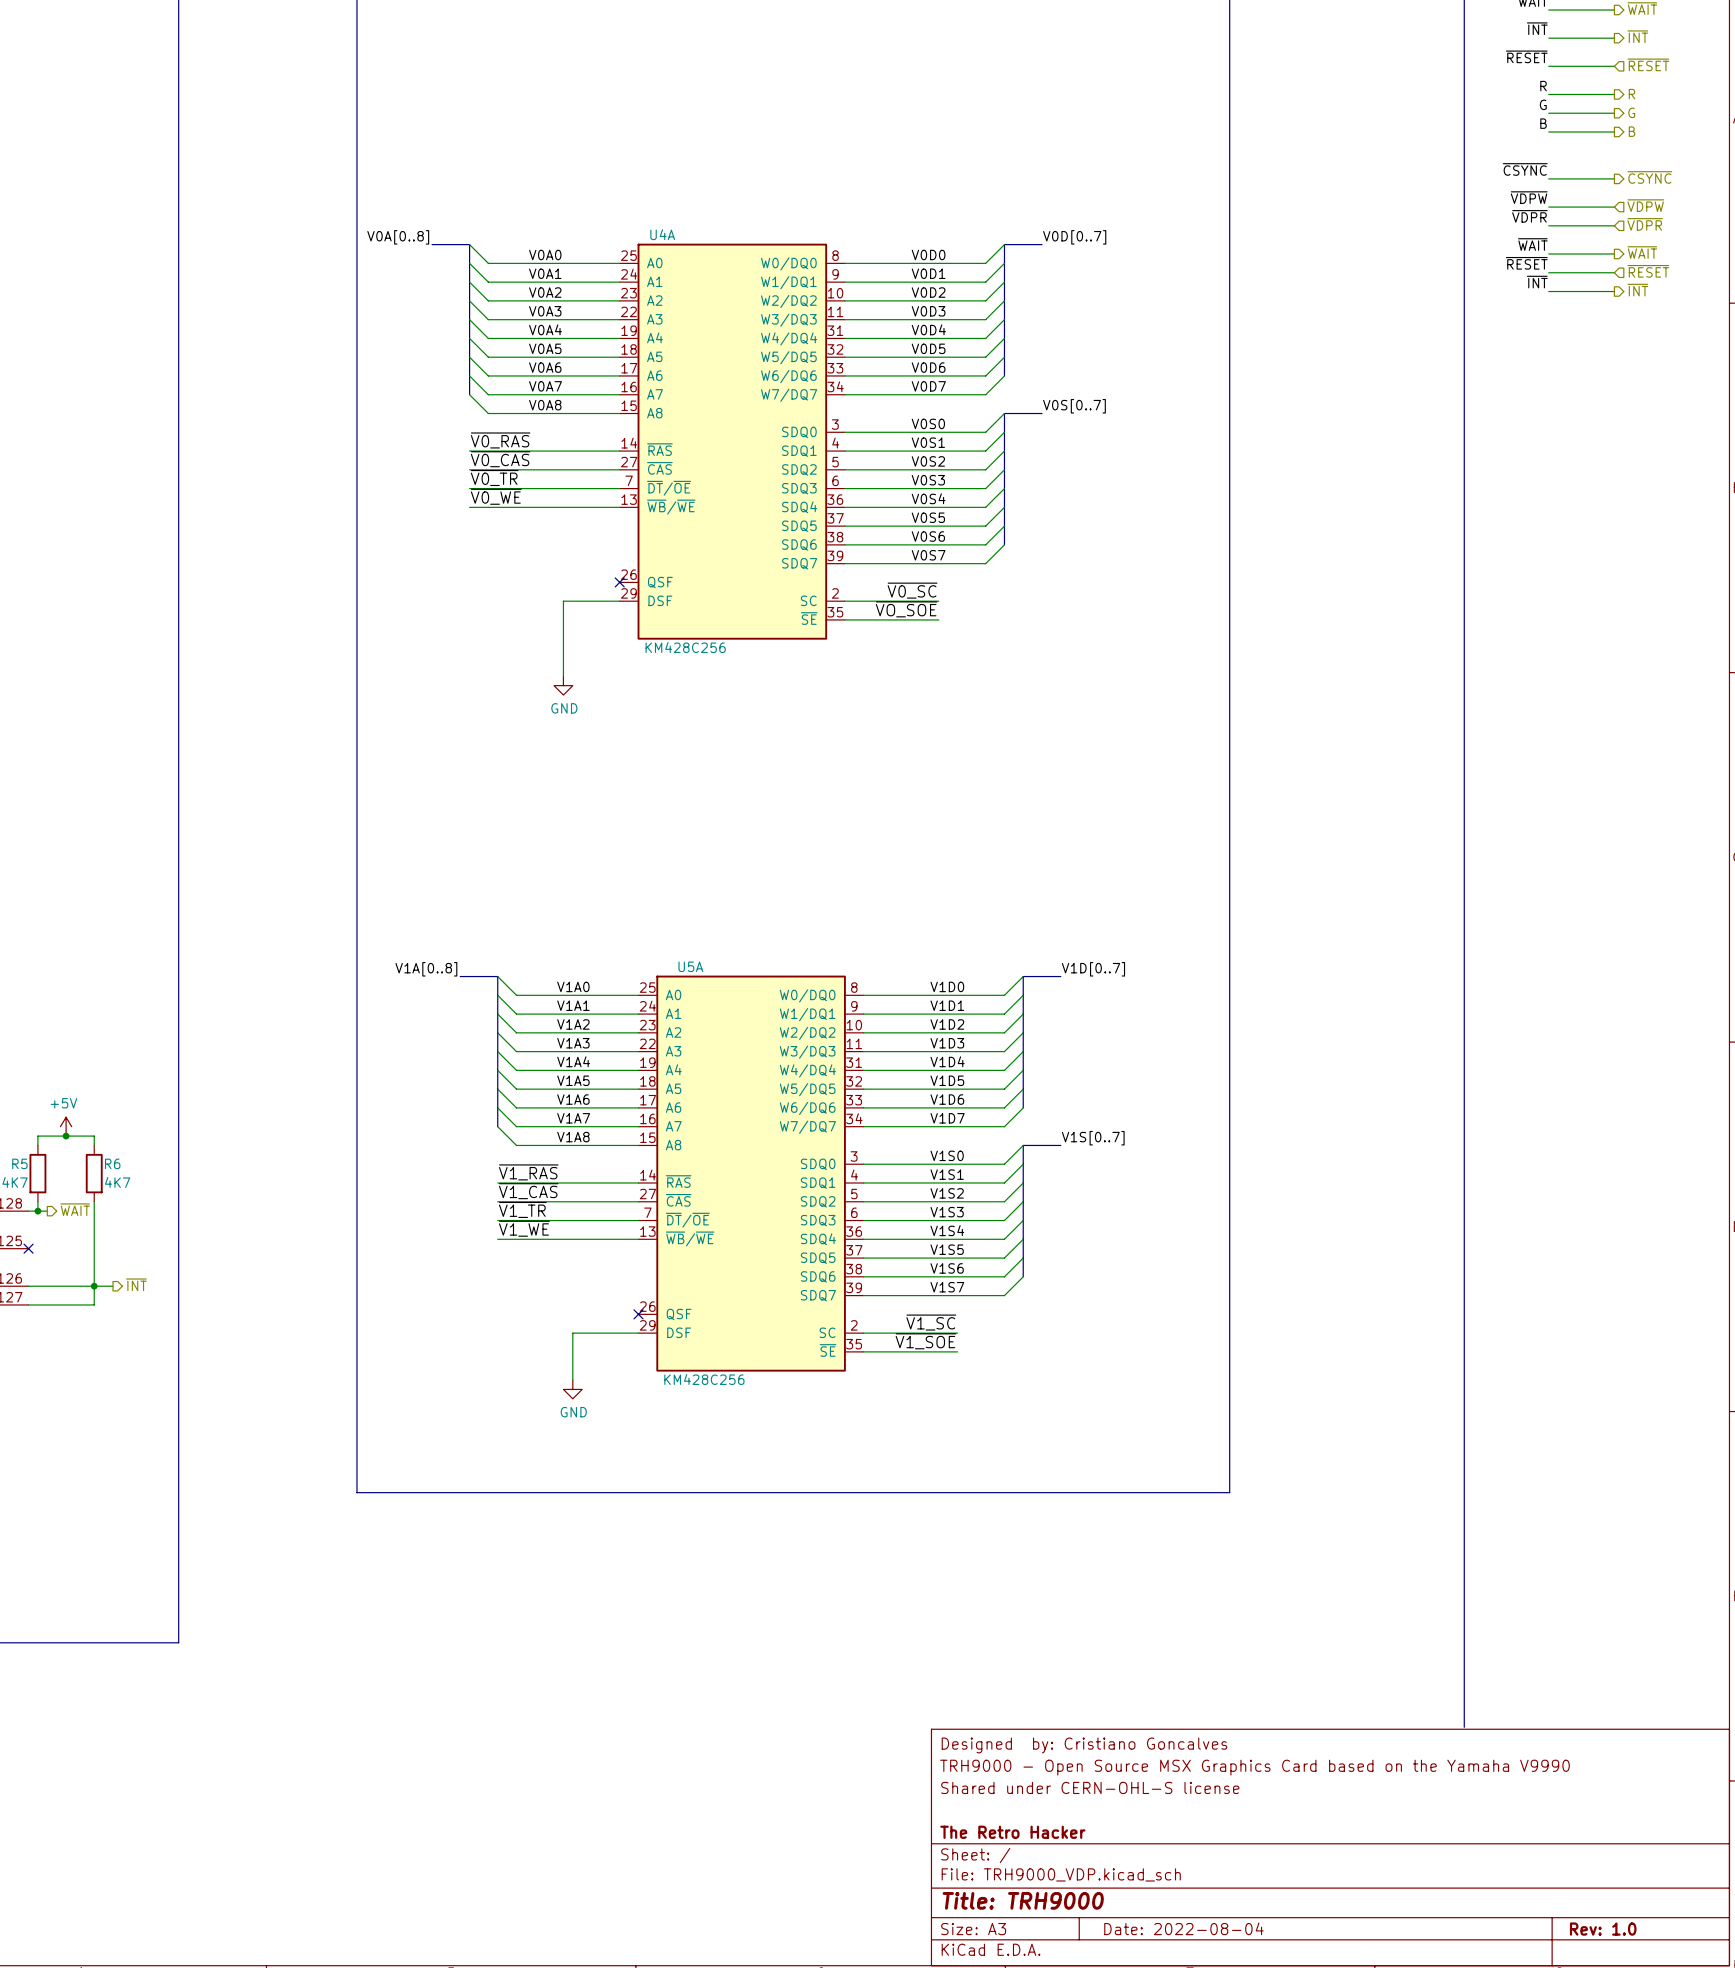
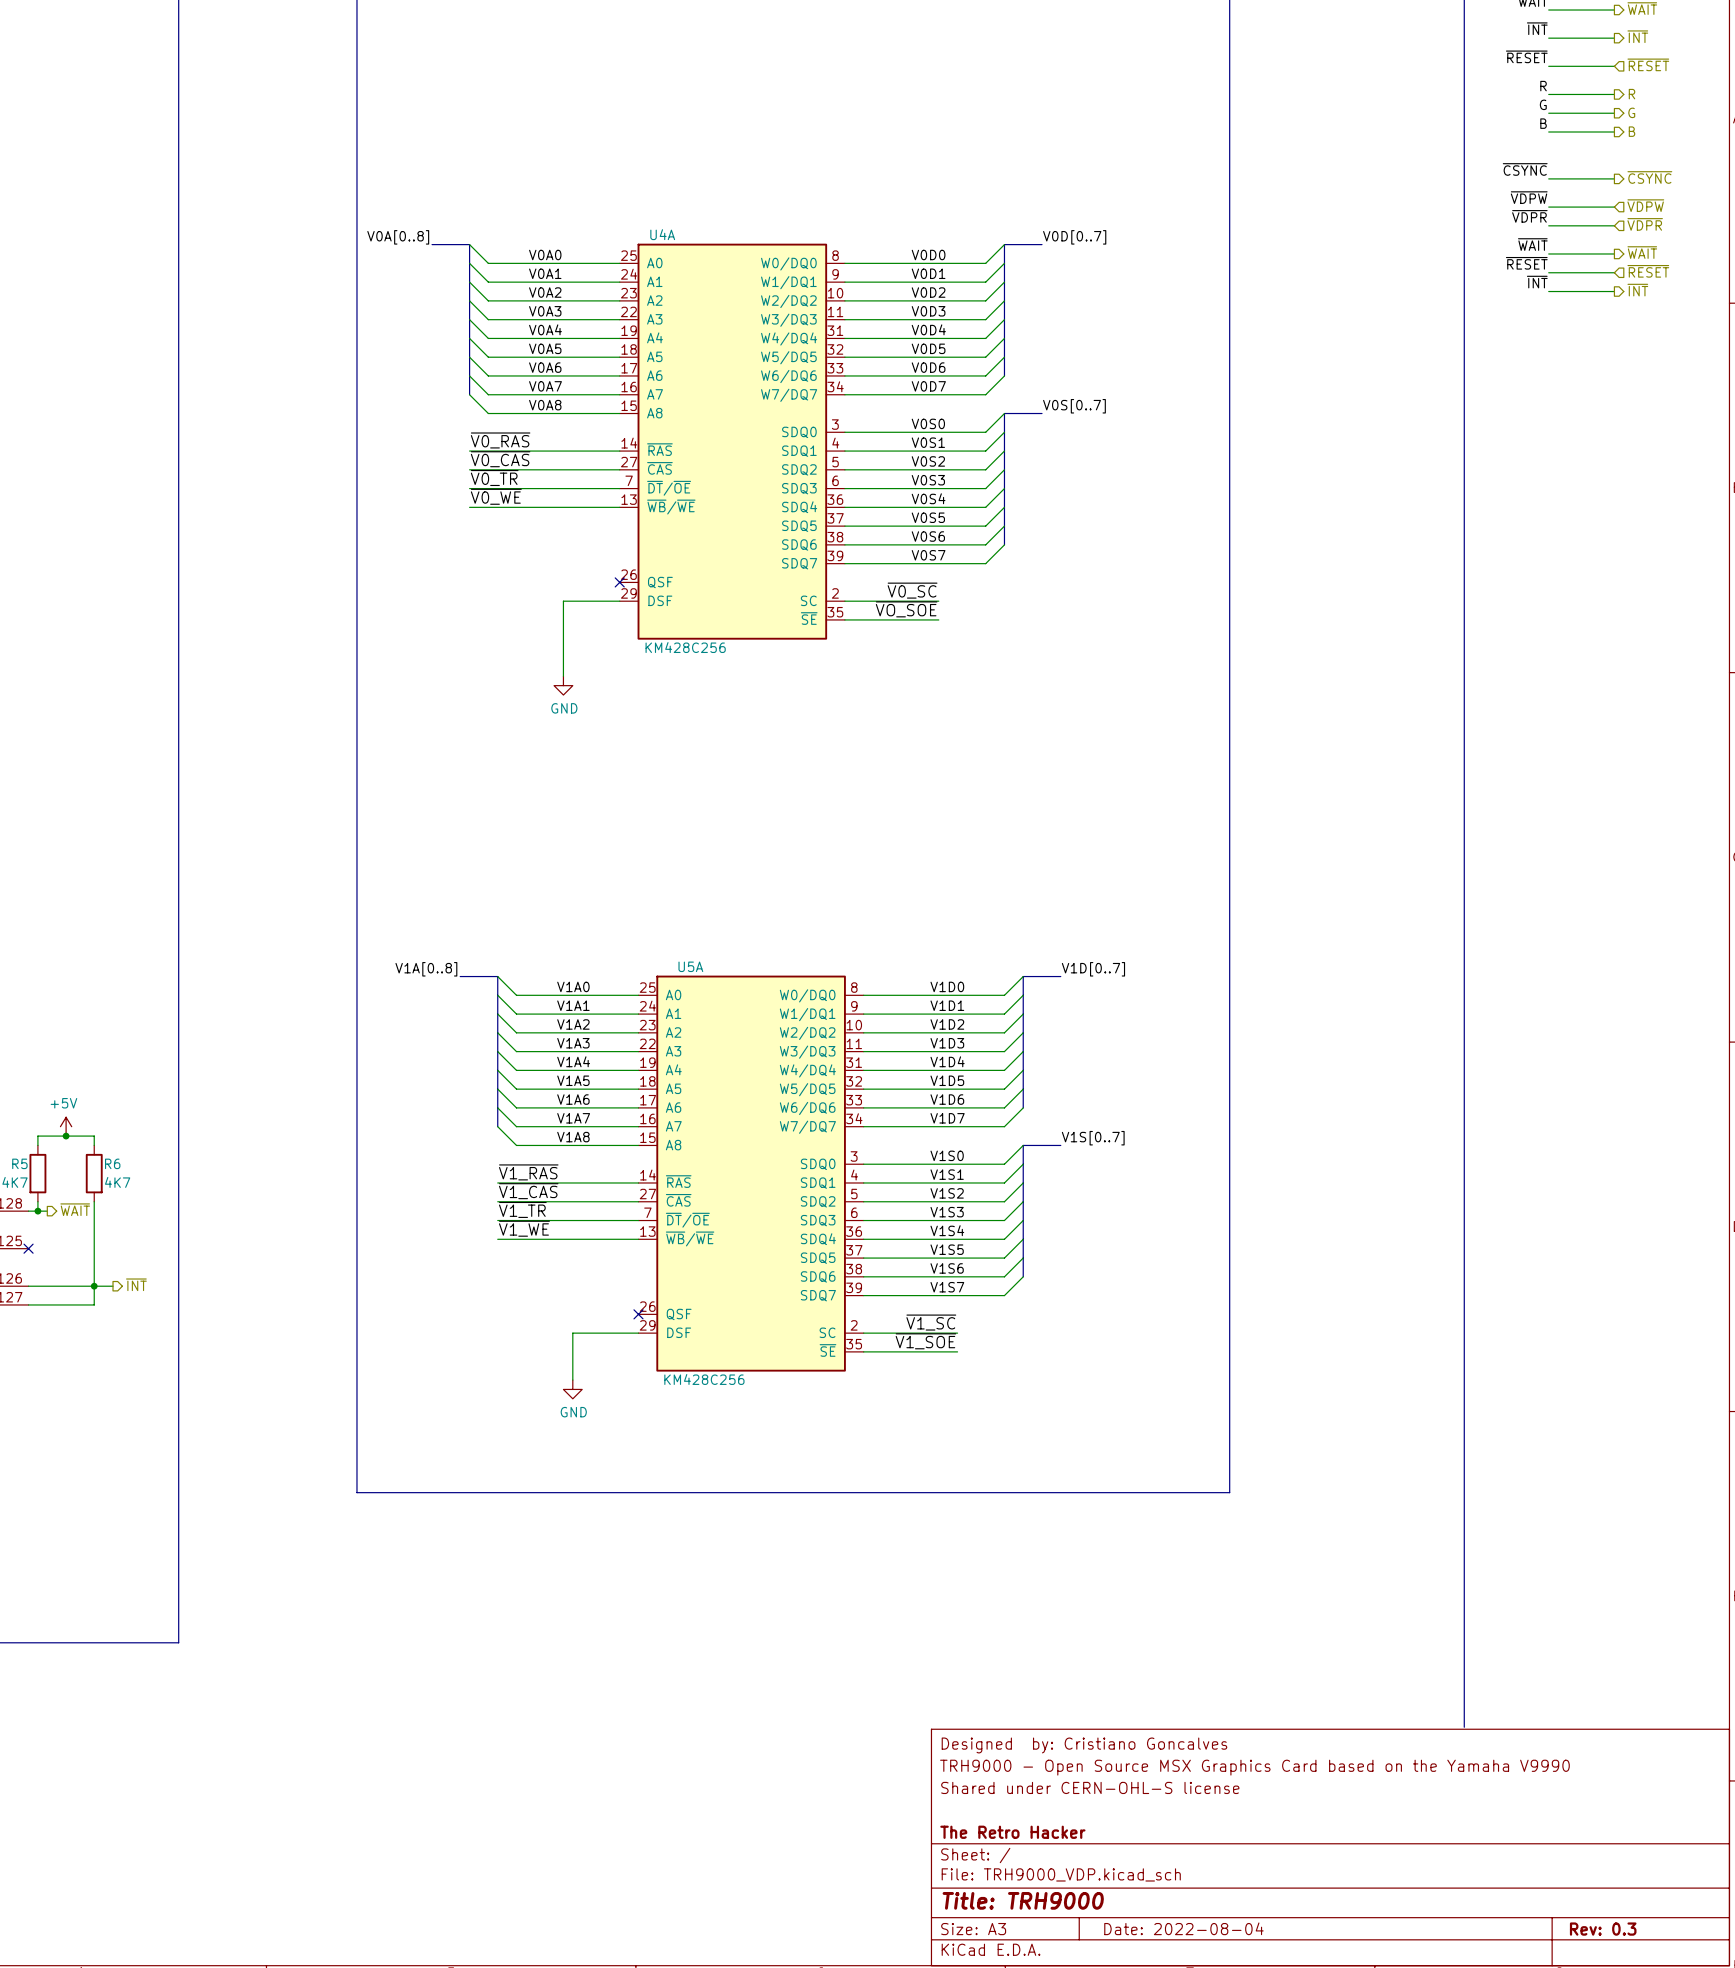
title block: Rev: 1.0 (1603, 1929) -> Rev: 0.3 (1603, 1929)

